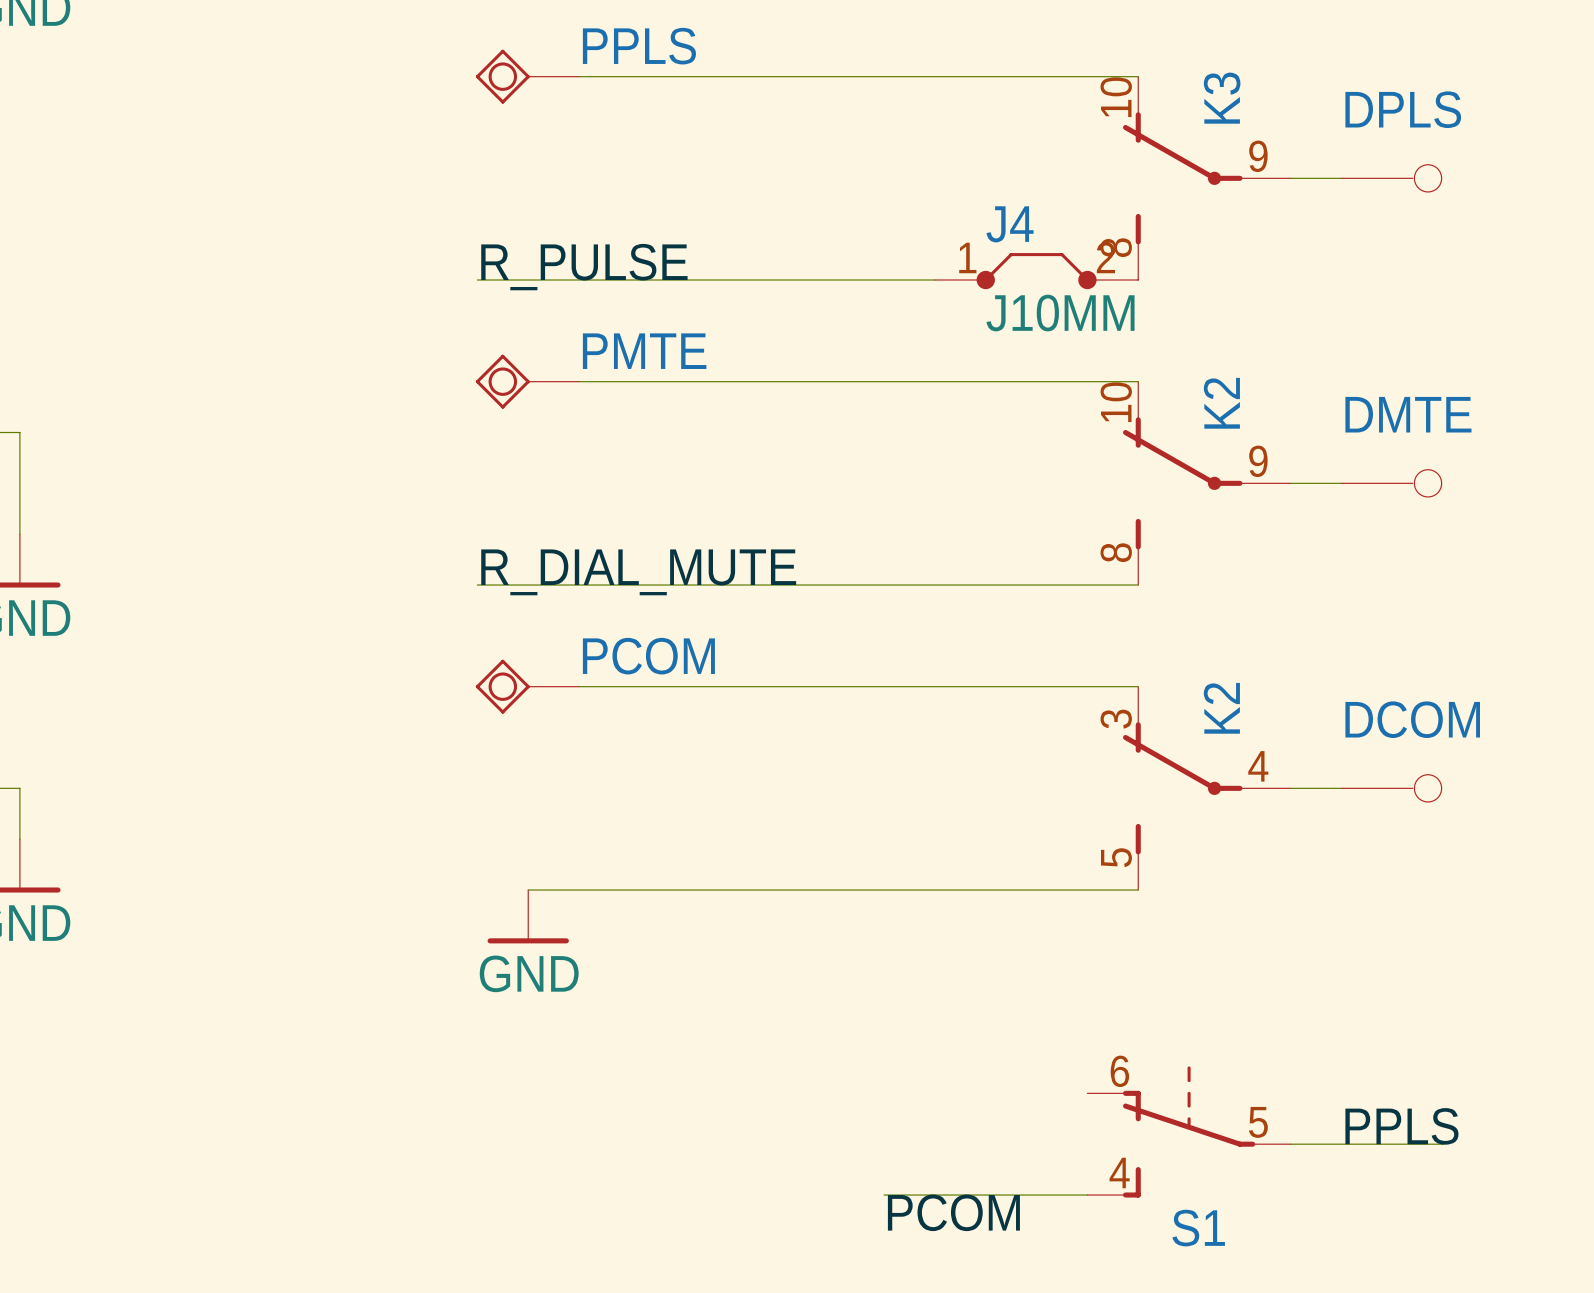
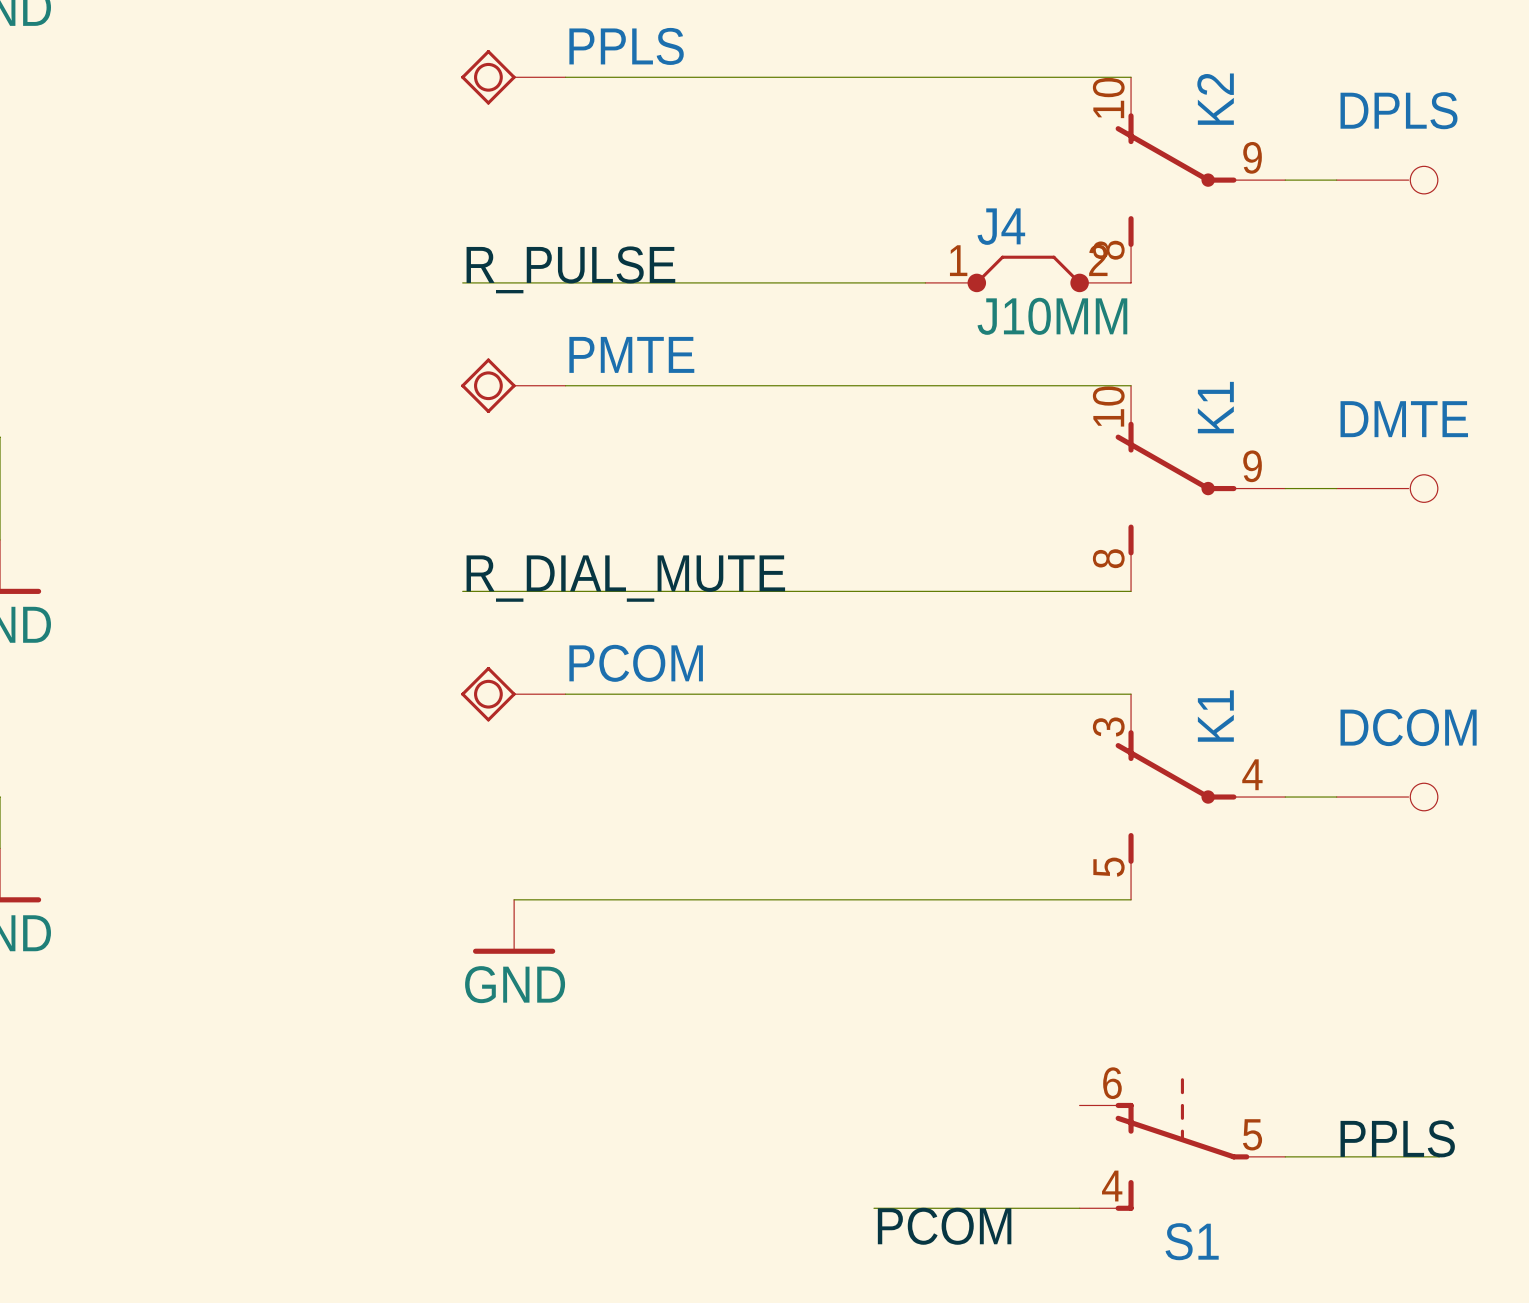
K3 name: K3 (1222, 98) -> K2 (1215, 99)
K2 name: K2 (1221, 403) -> K1 (1215, 407)
K2 name: K2 (1221, 708) -> K1 (1215, 716)

